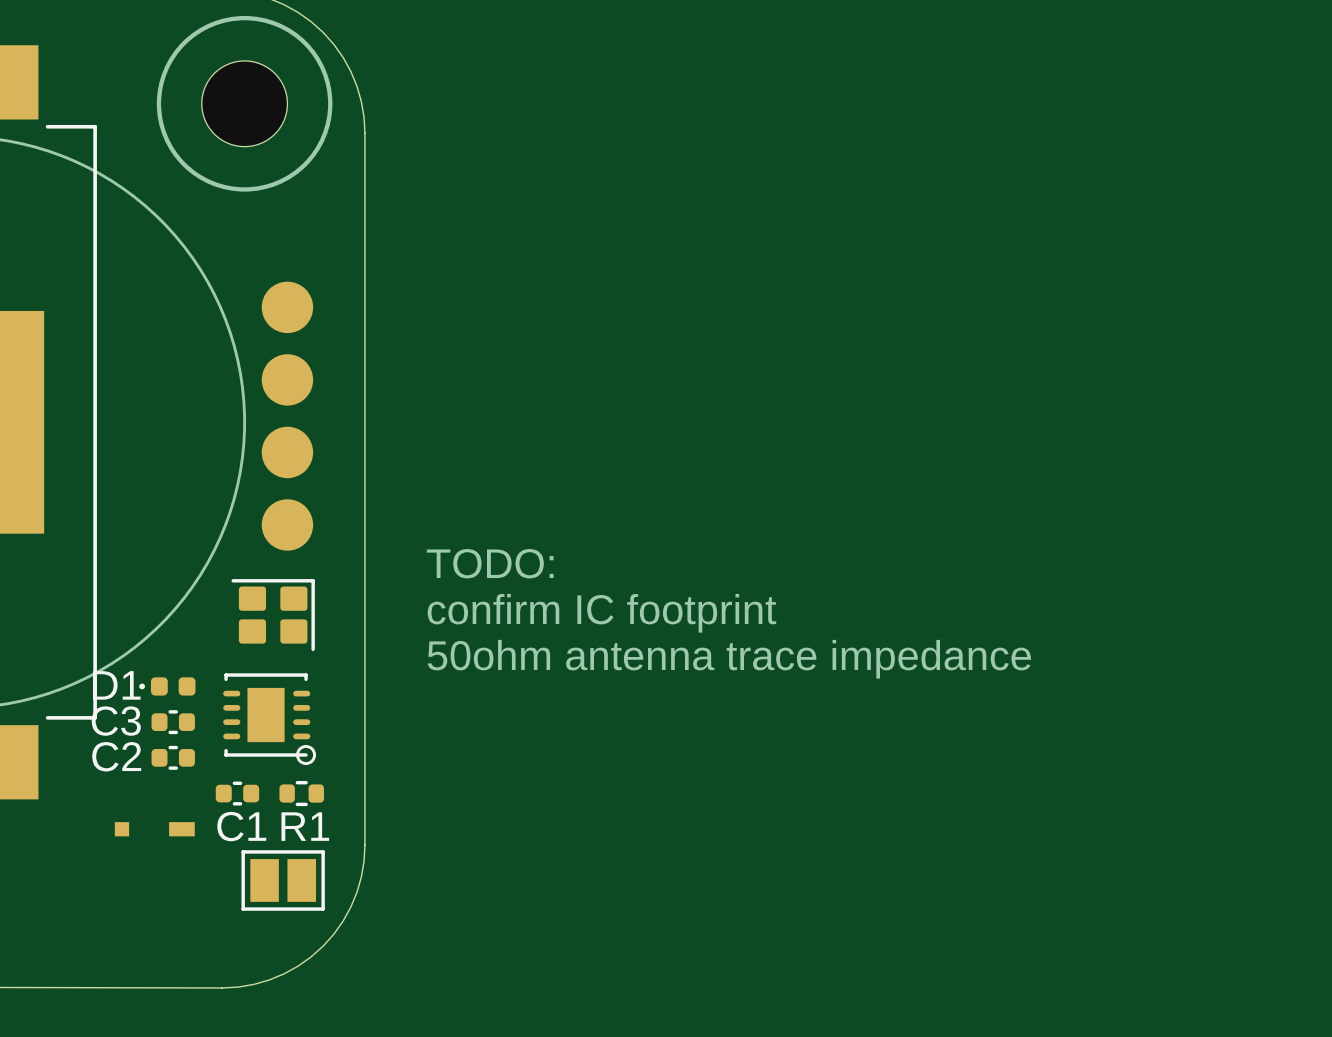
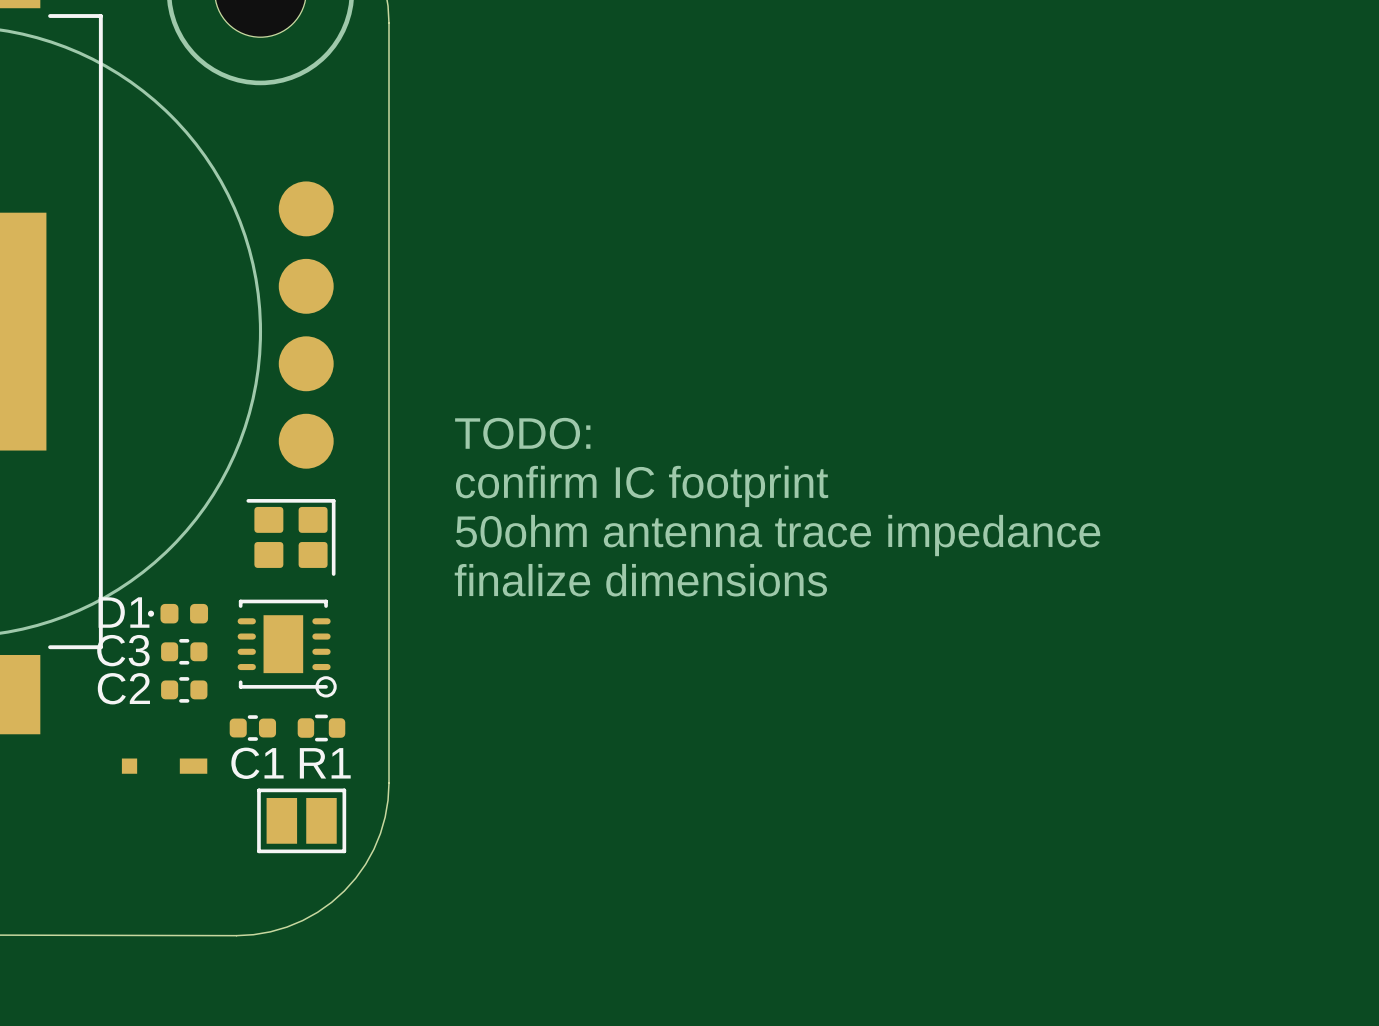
text: none -> TODO: (522, 433)
text: TODO: (490, 563) -> confirm IC footprint (642, 486)
text: confirm IC footprint (601, 613) -> 50ohm antenna trace impedance (778, 535)
text: 50ohm antenna trace impedance (729, 659) -> finalize dimensions (640, 580)

